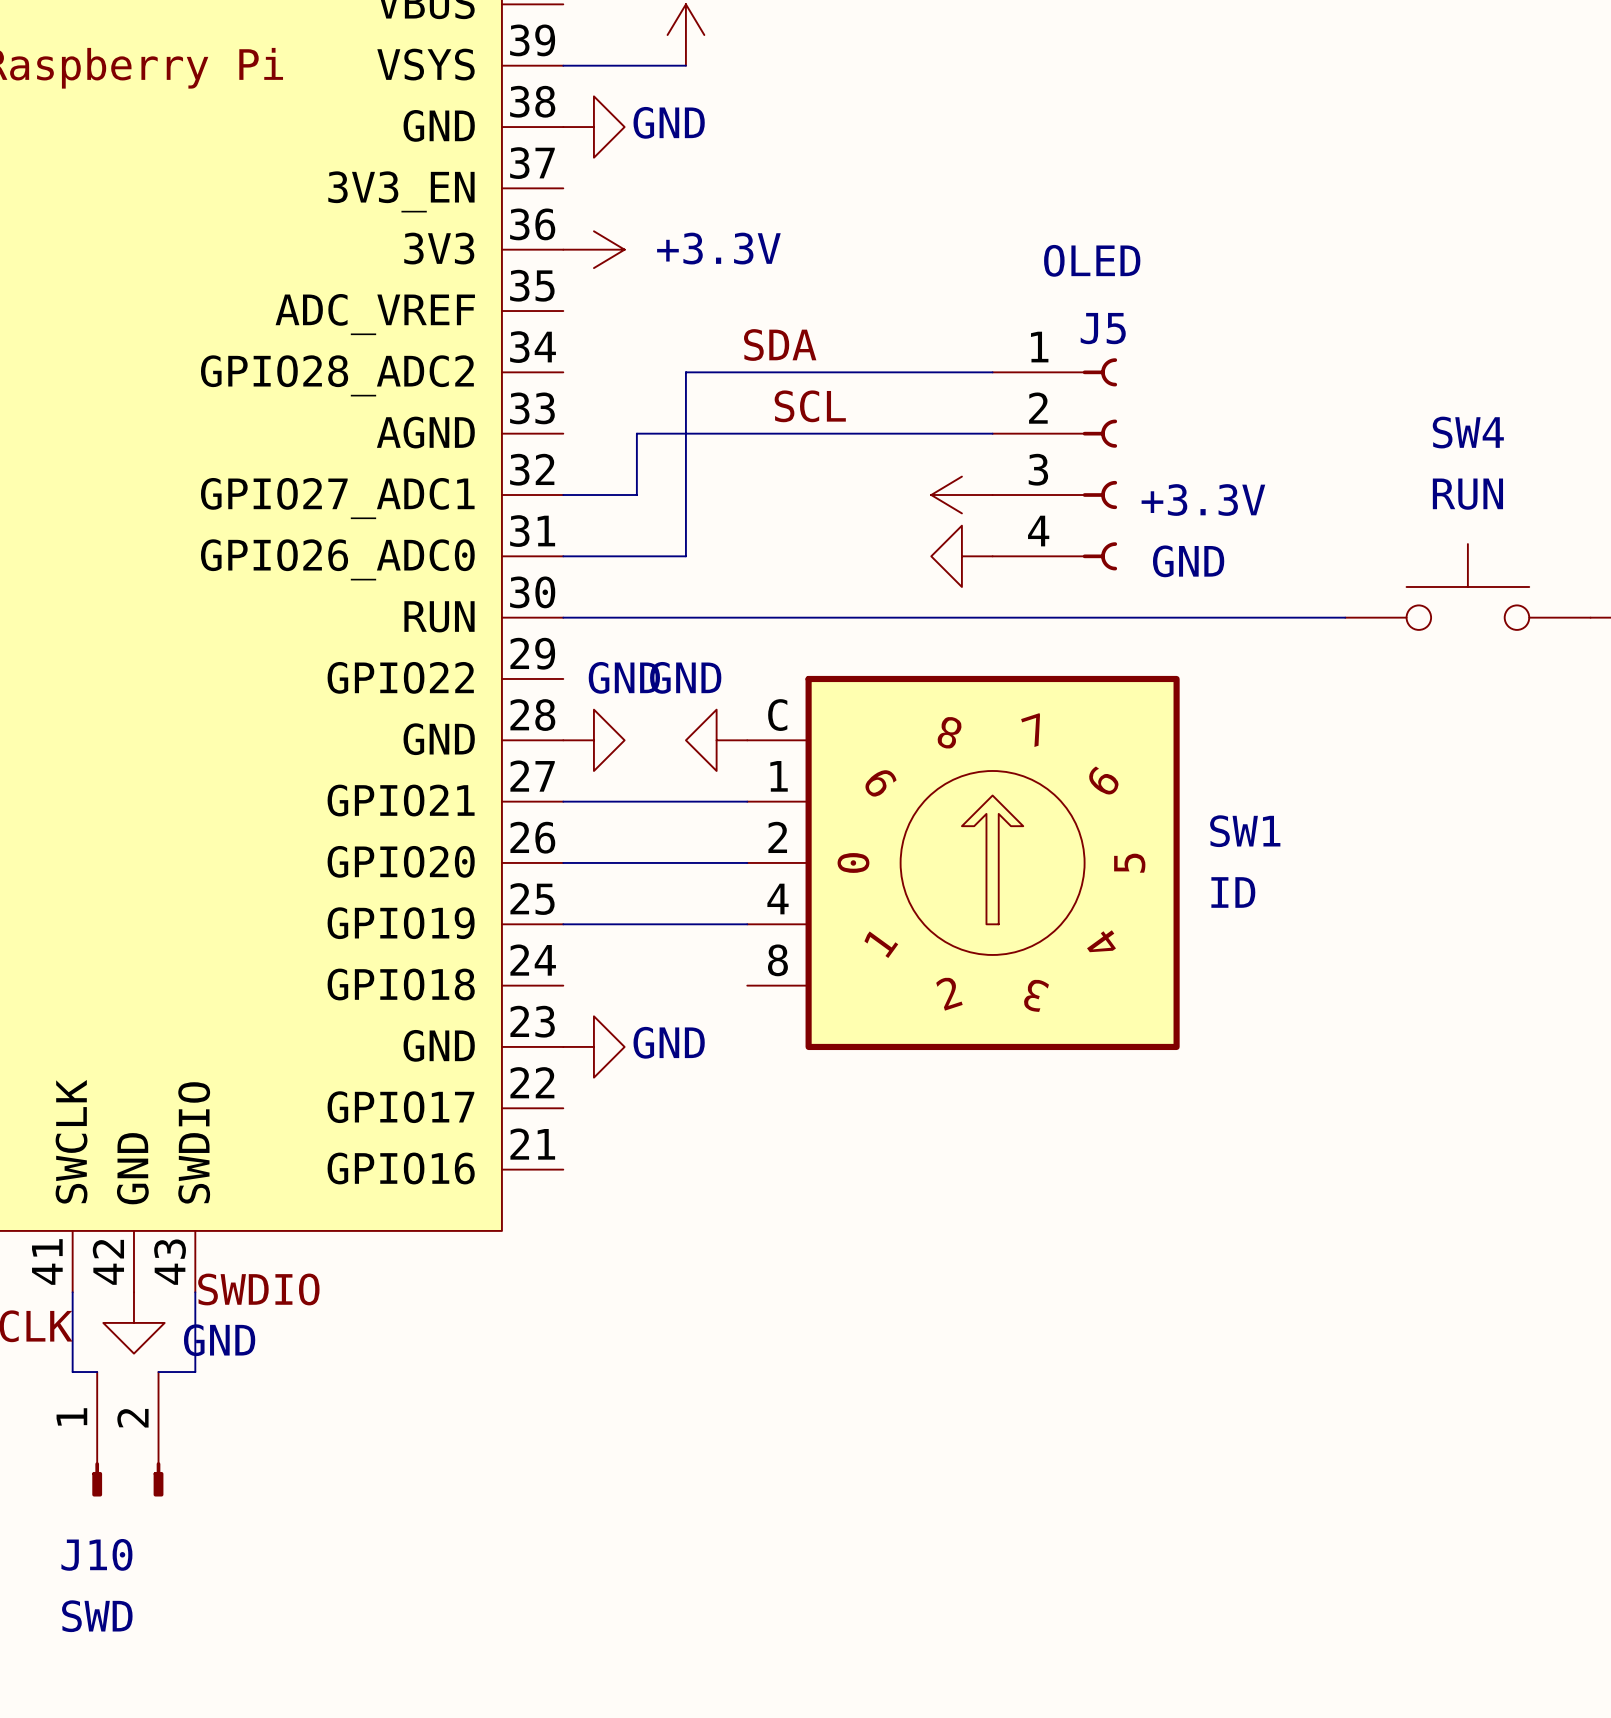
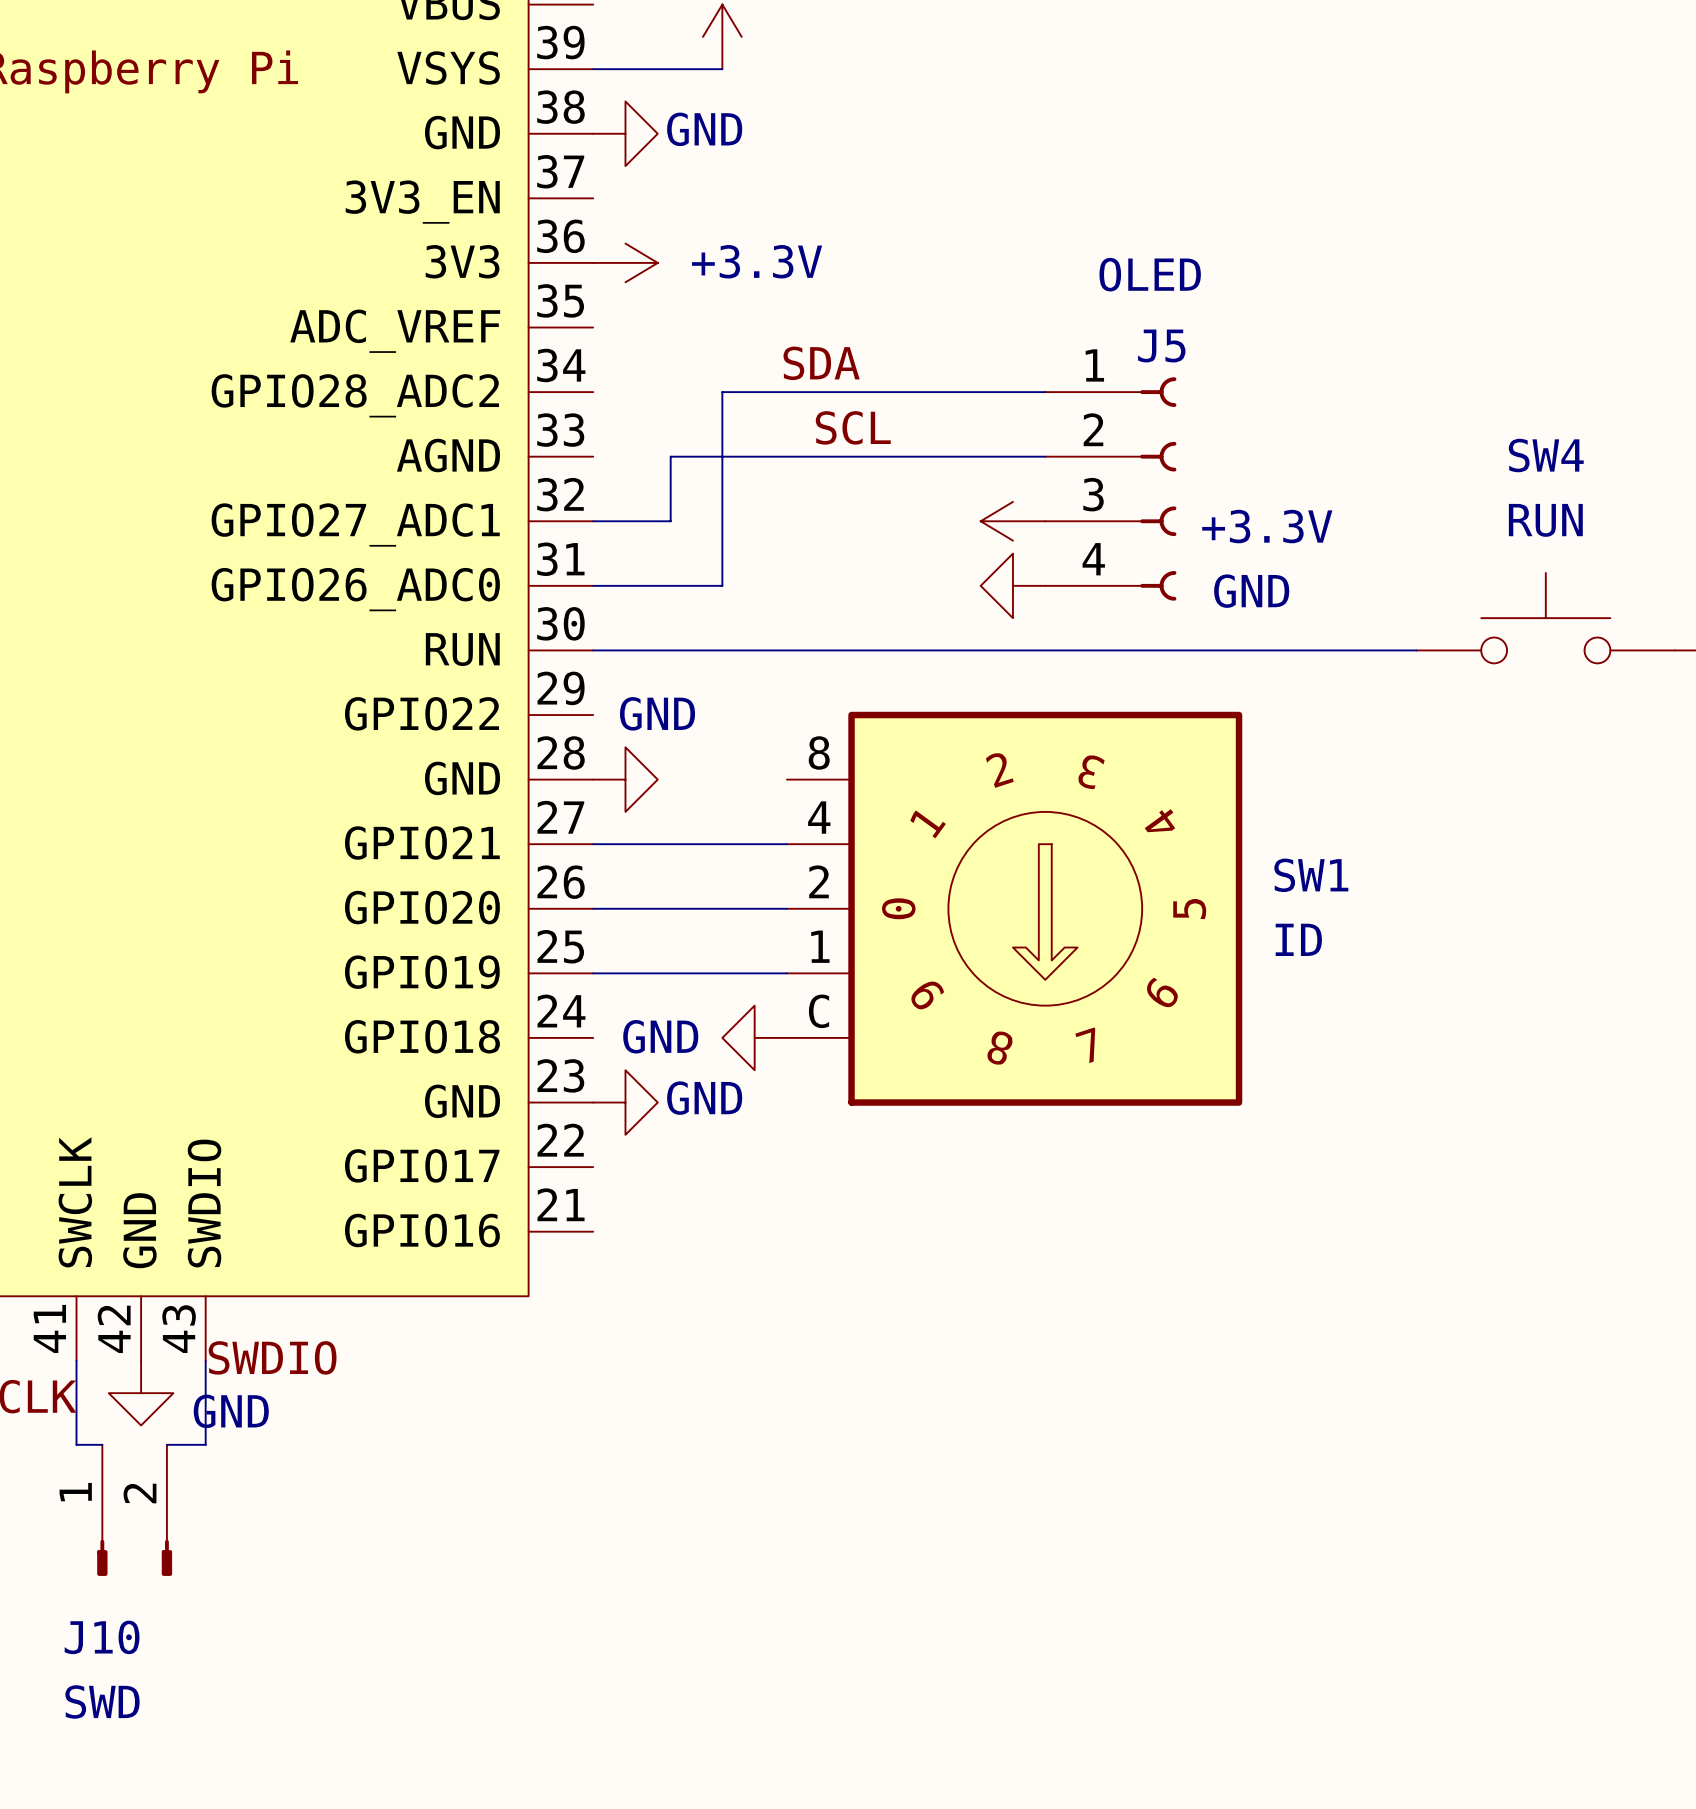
power symbol text position: GND (685, 677) -> GND (660, 1036)
power symbol position: GND (716, 740) -> GND (754, 1037)
SW1 flip: as is (992, 862) -> up-down (1045, 908)

